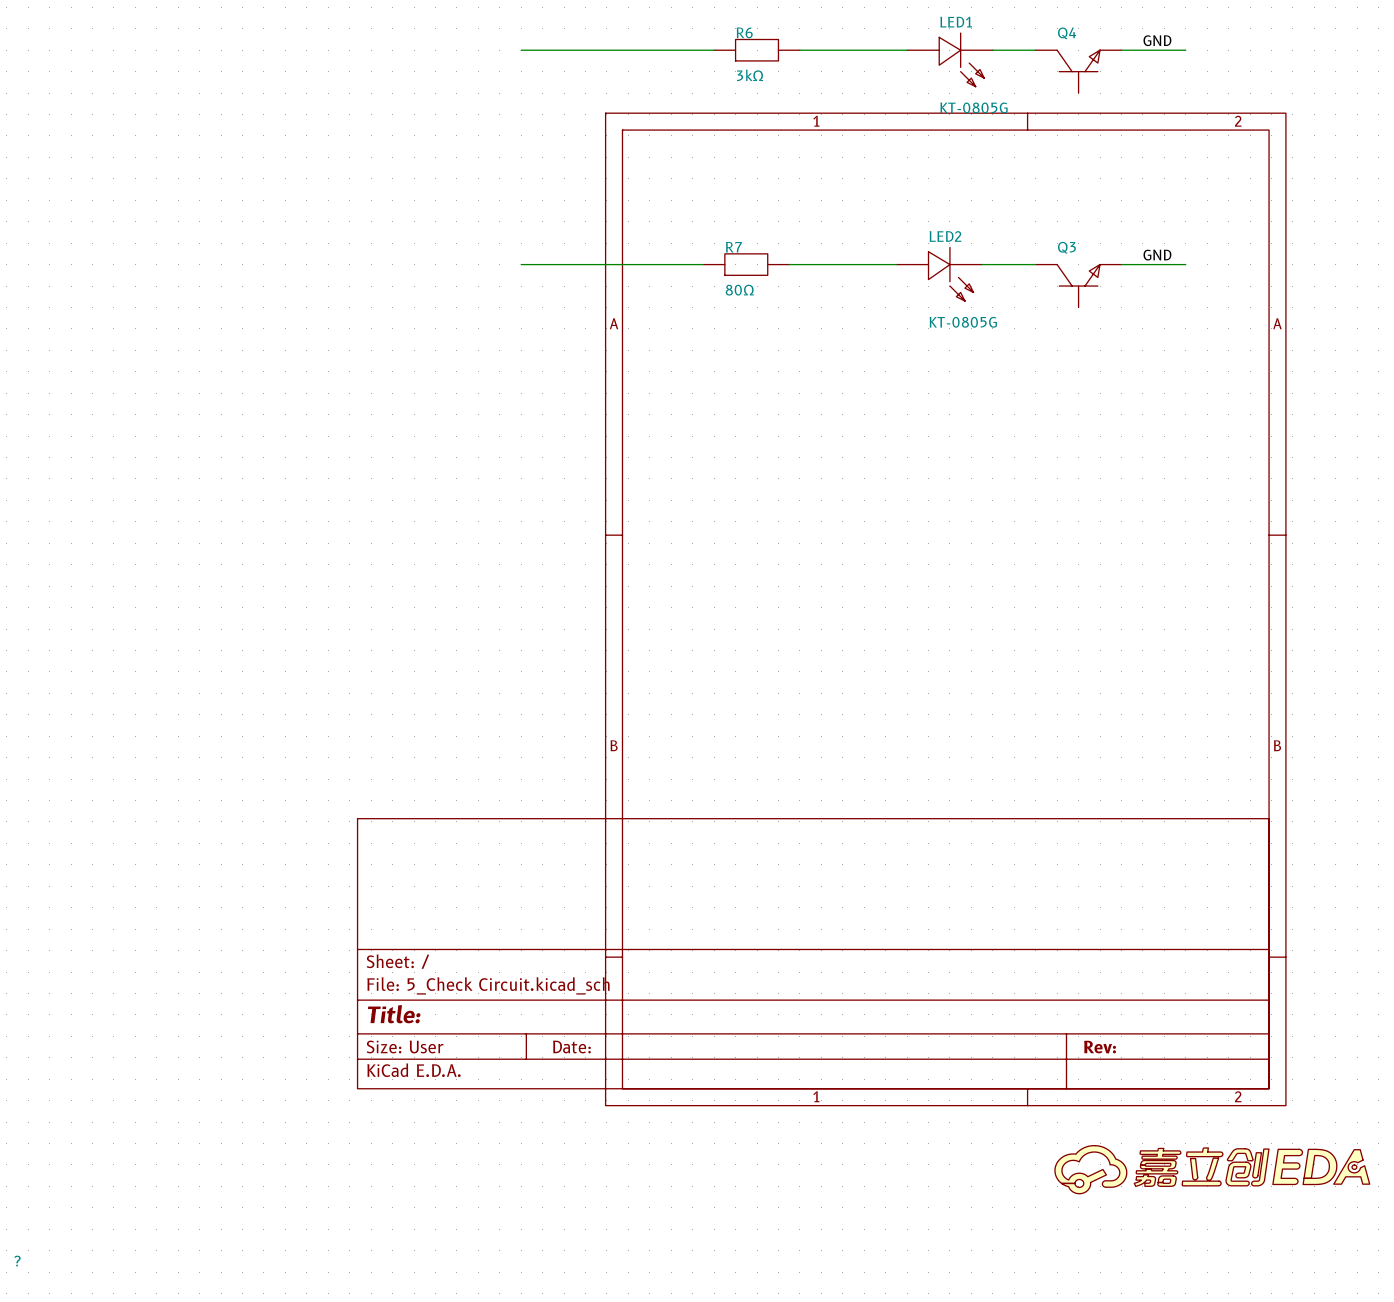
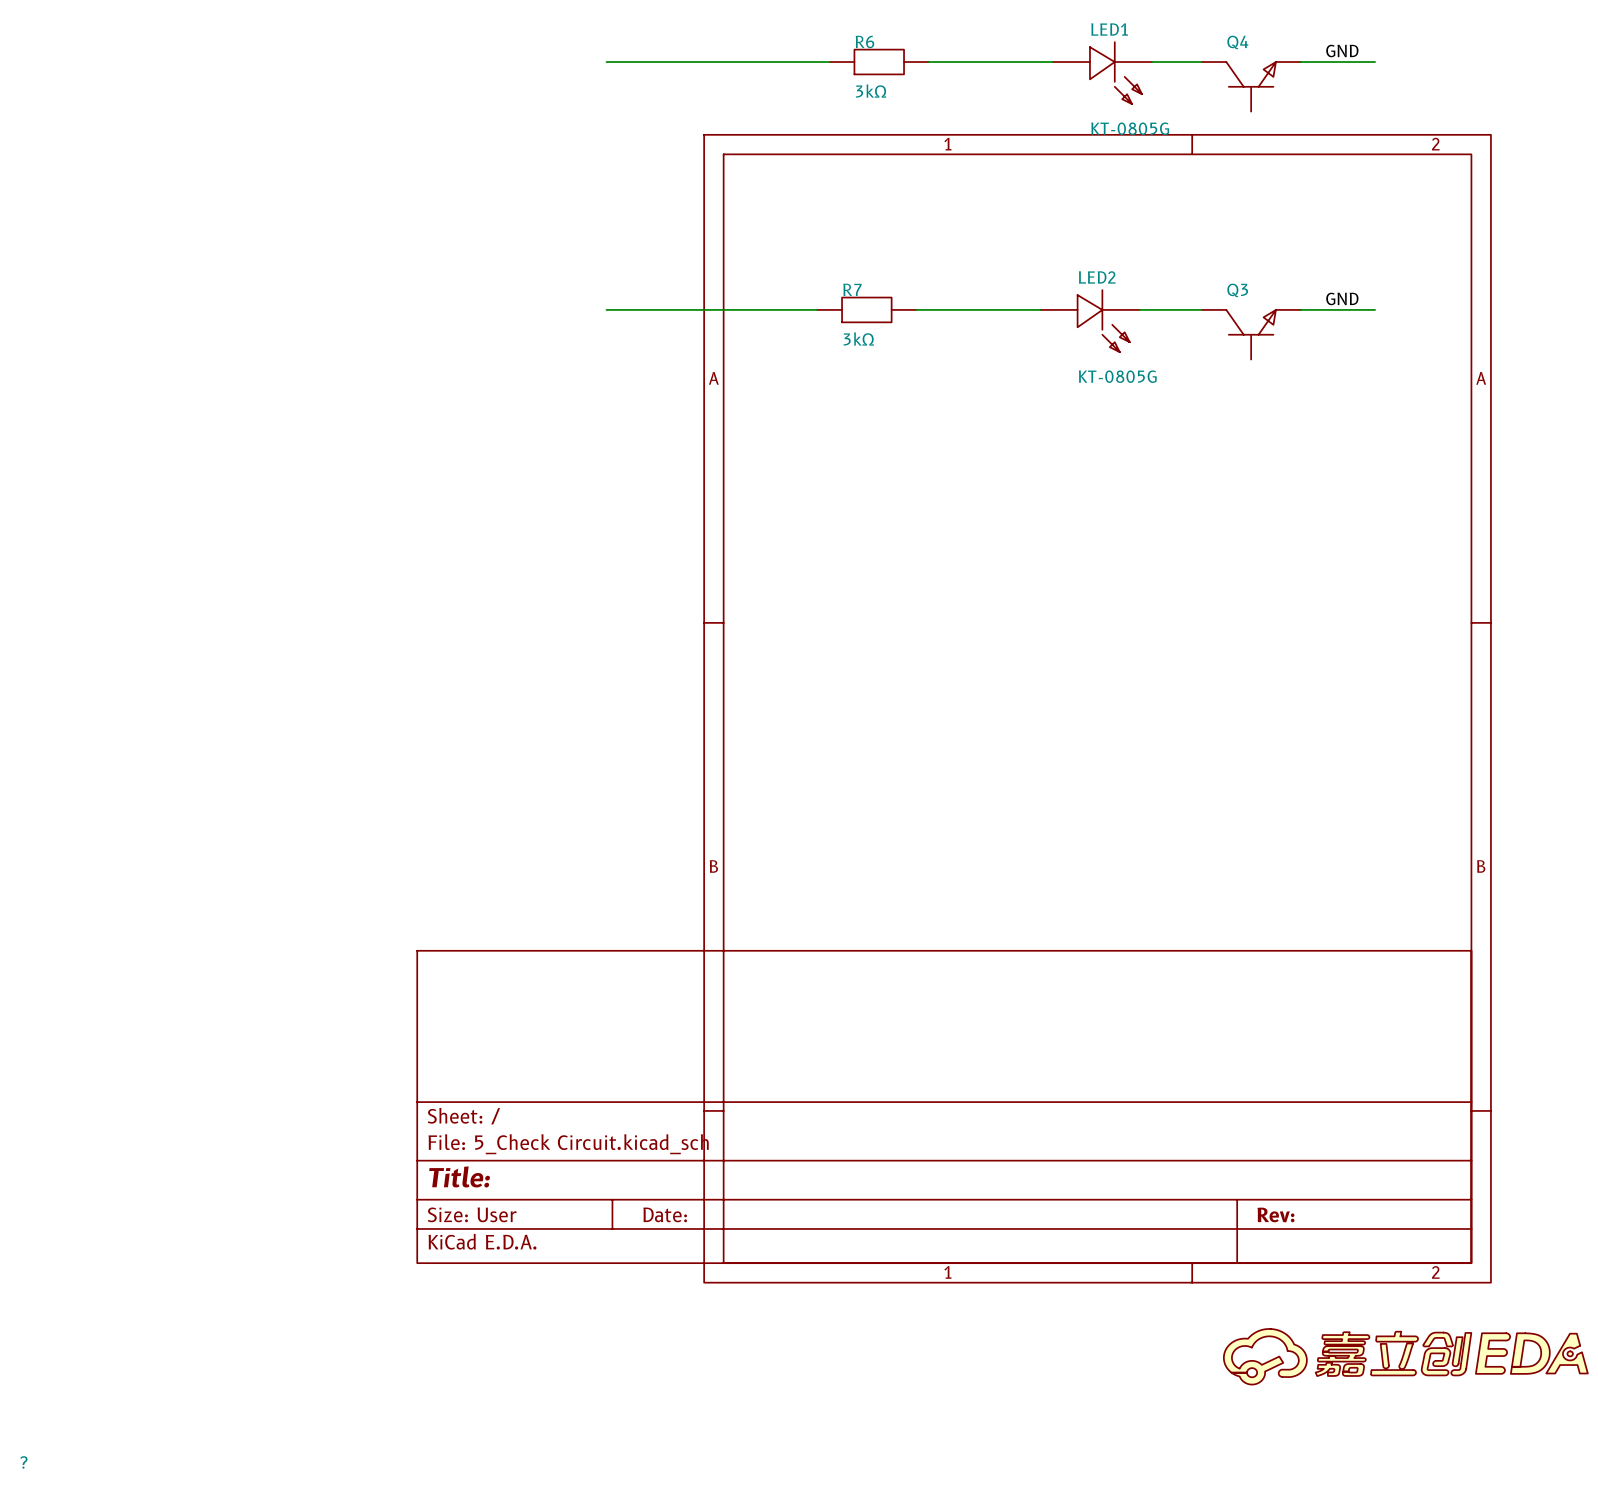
R7 value: 80Ω (739, 290) -> 3kΩ (858, 339)

